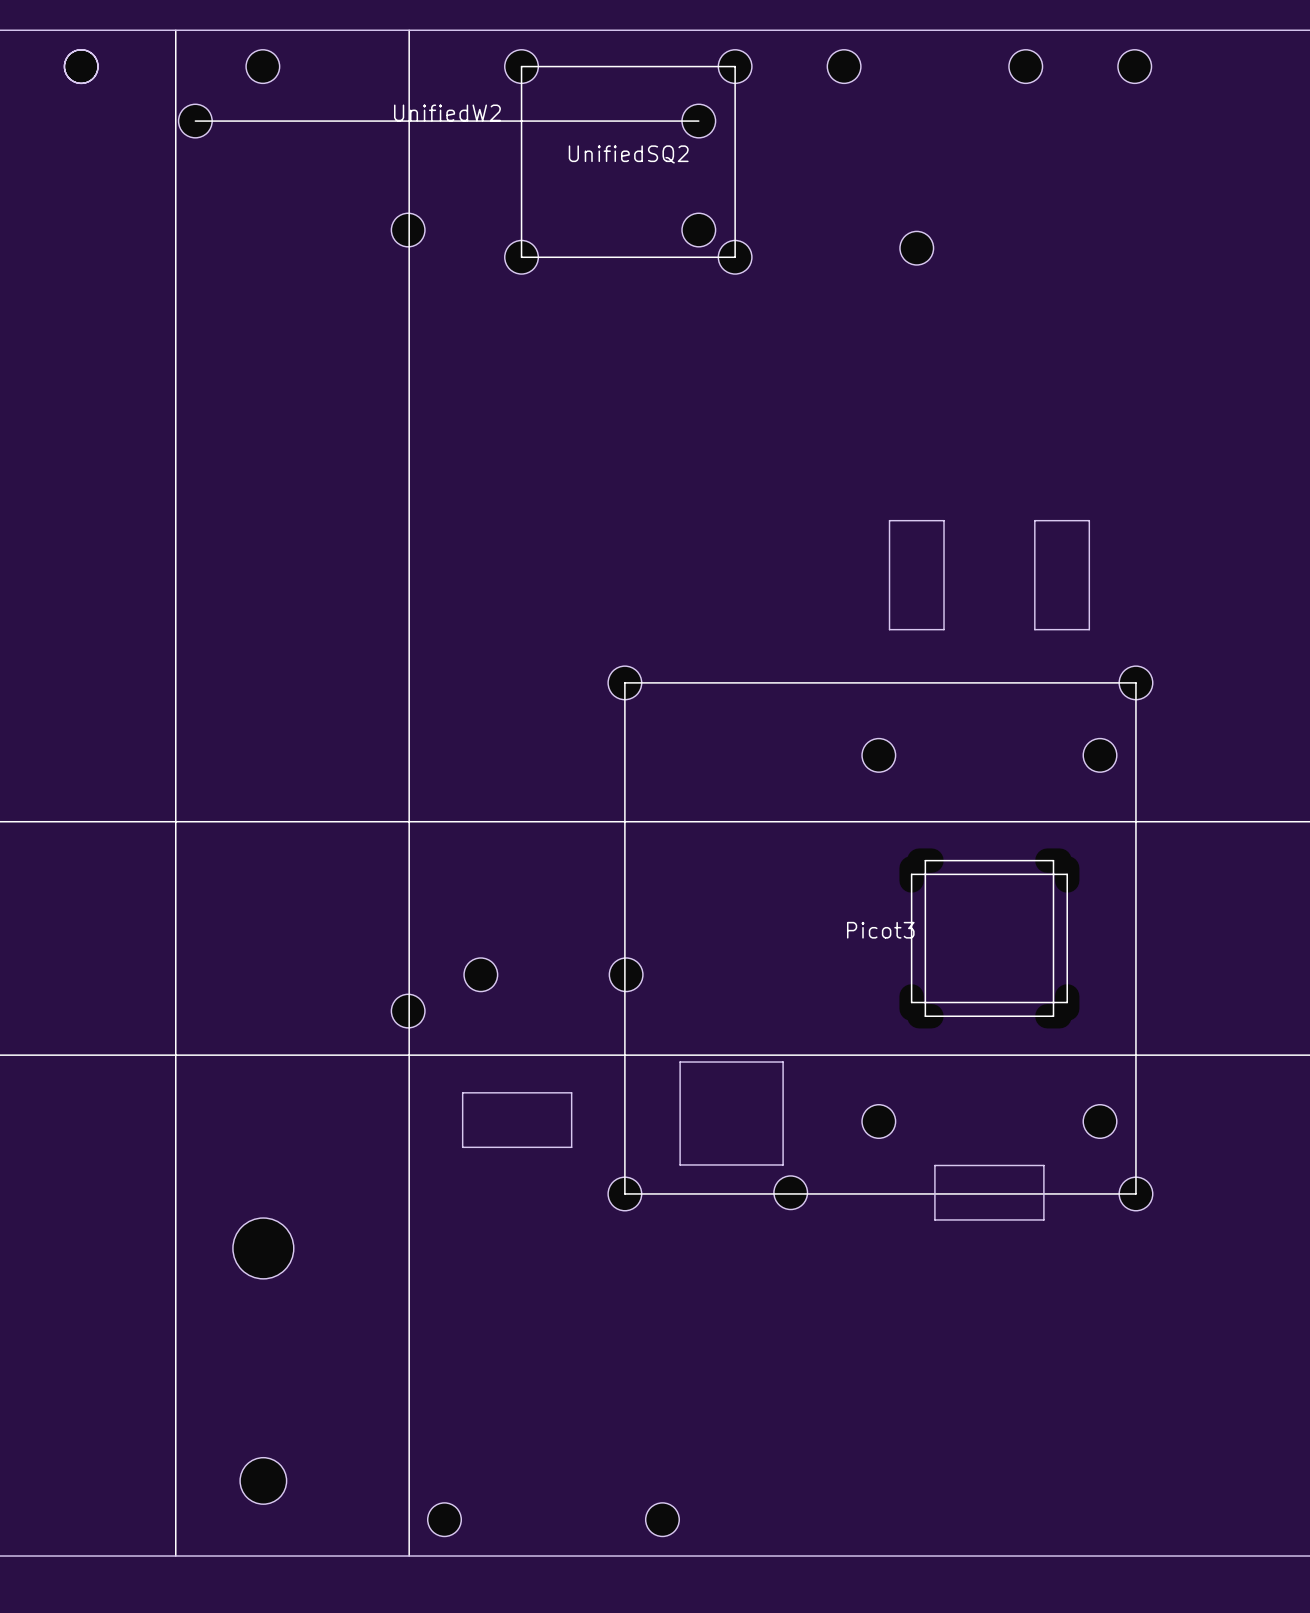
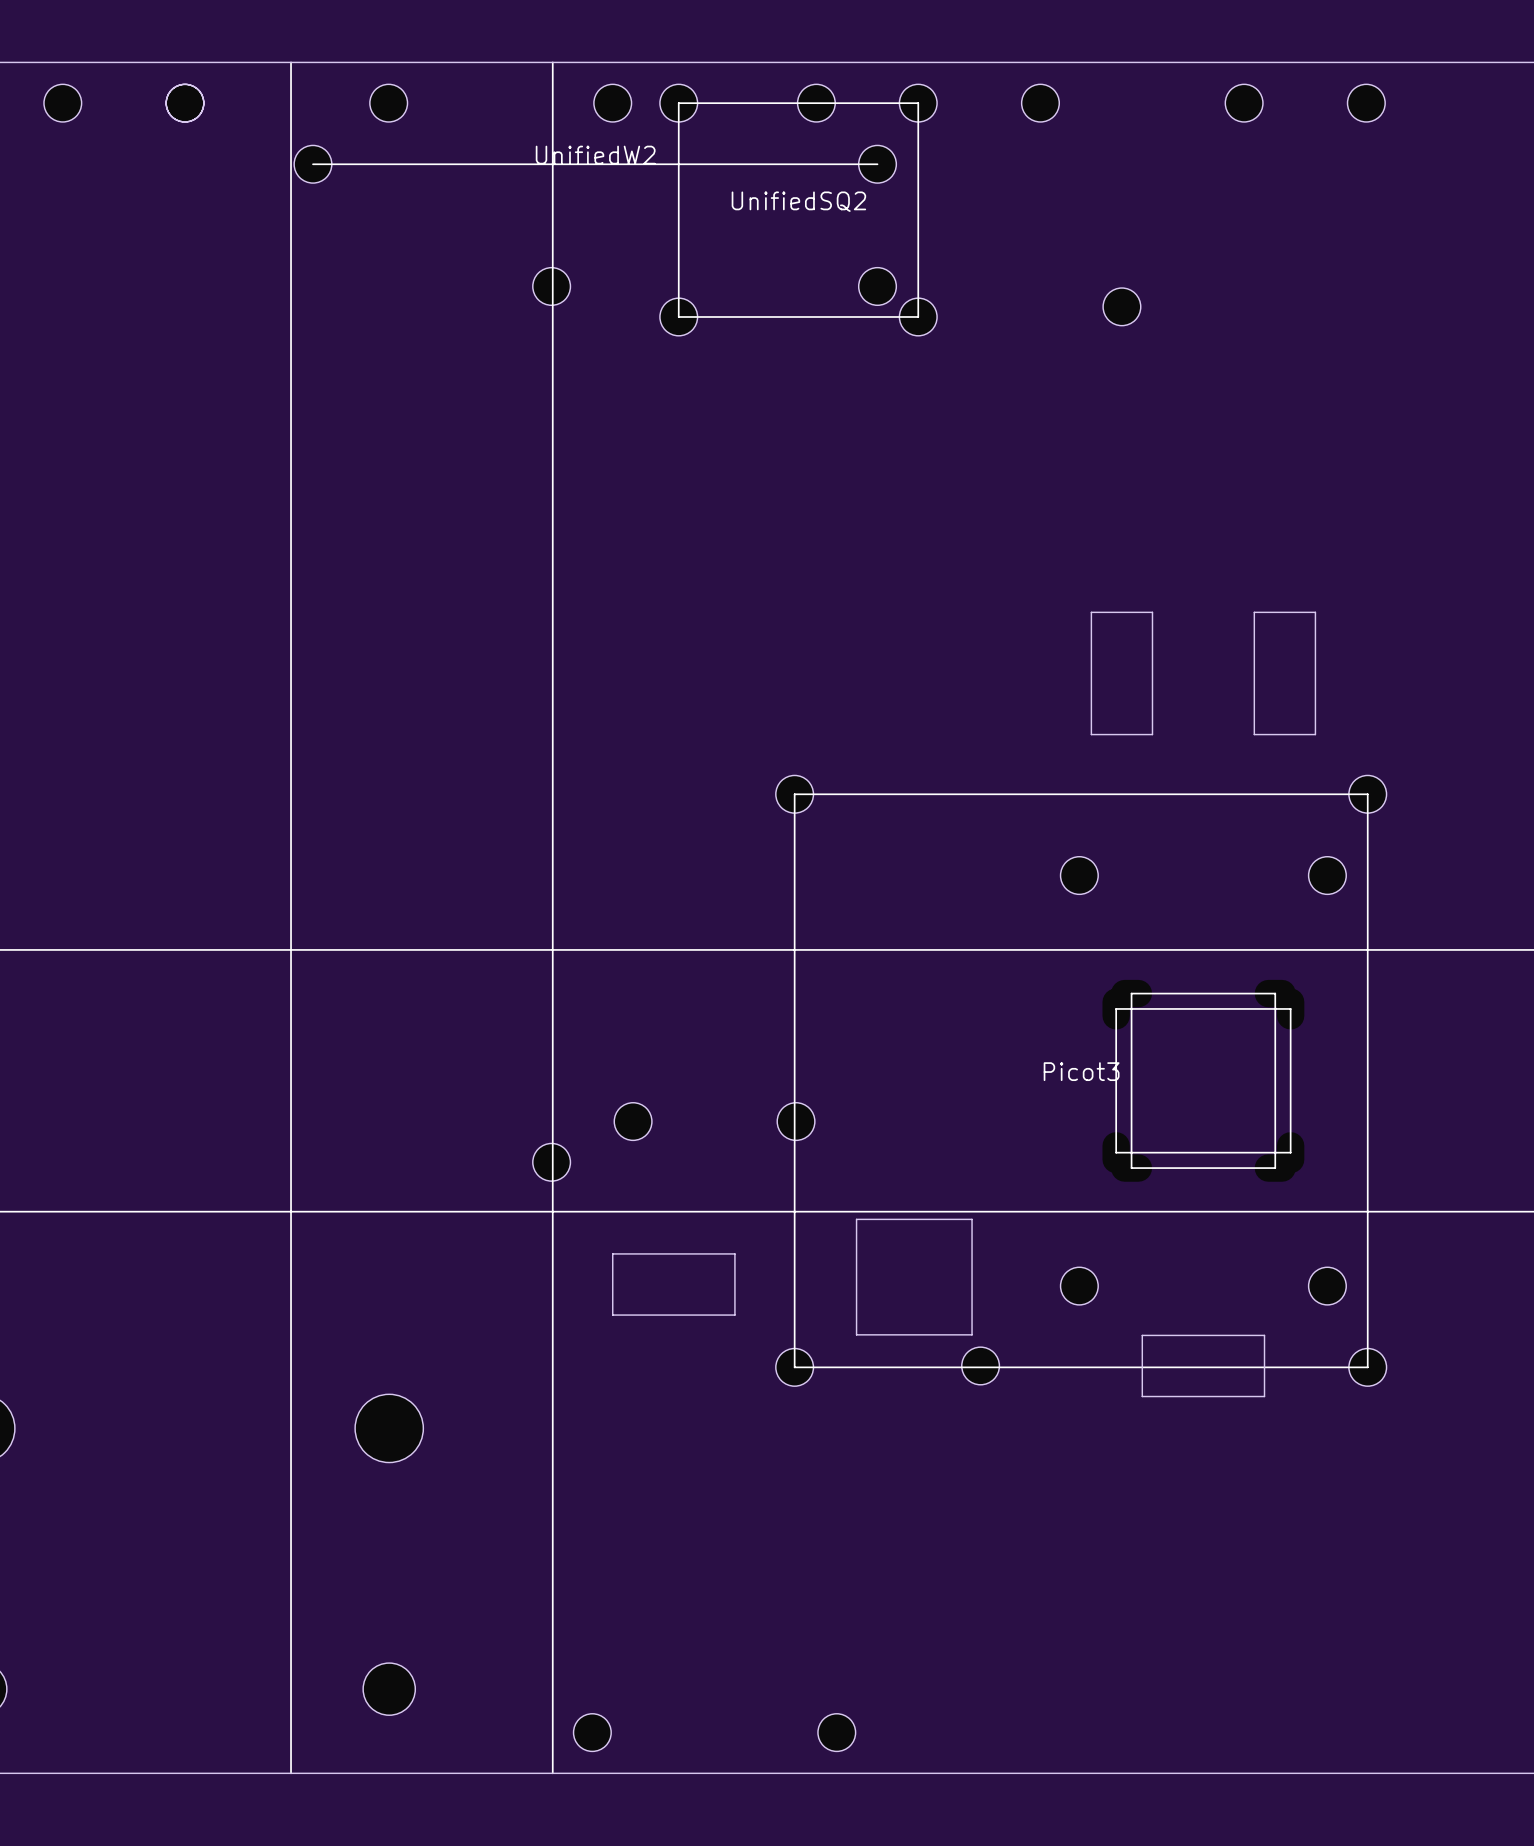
part: none -> (612, 103)
part: none -> (816, 103)

